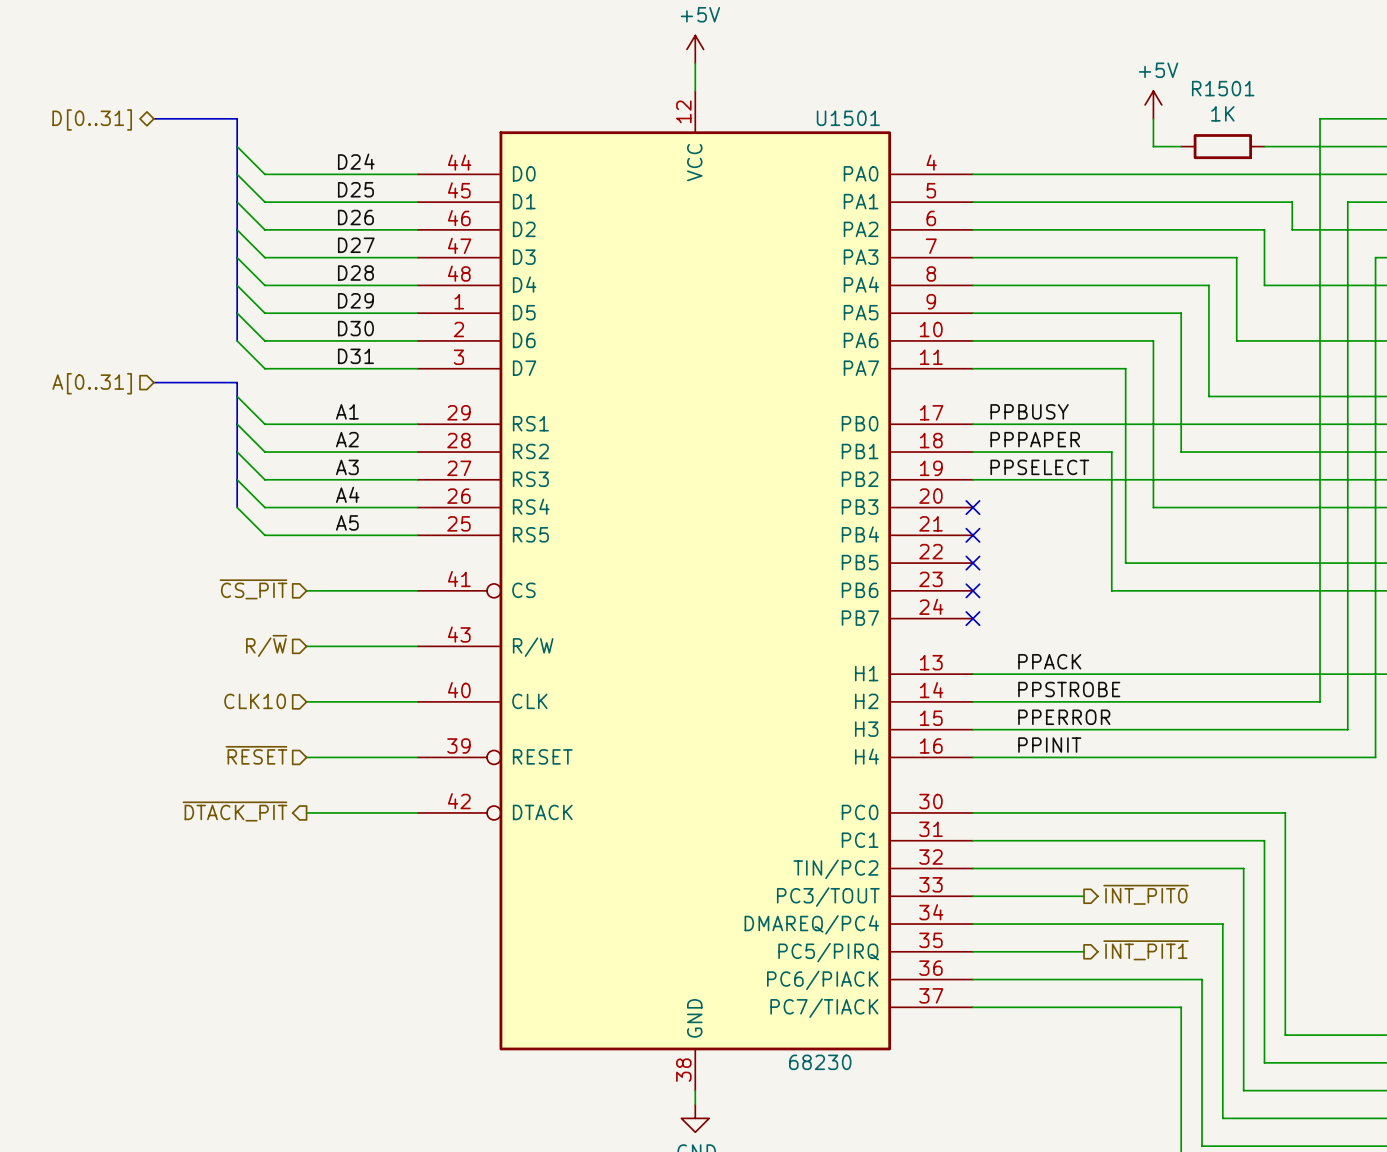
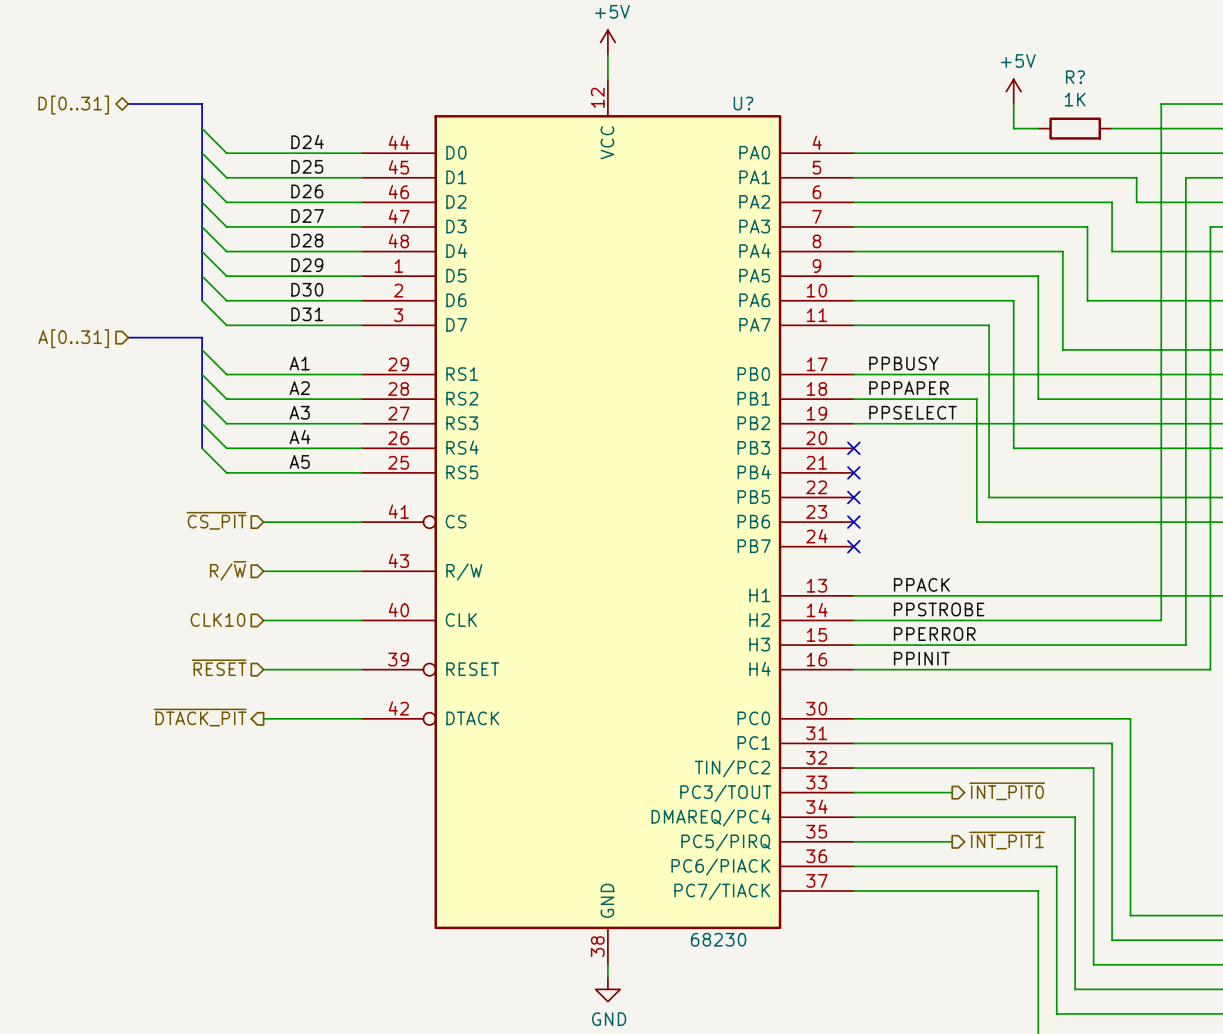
R1501 name: R1501 (1223, 88) -> R? (1075, 77)
U1501 name: U1501 (848, 118) -> U? (743, 103)

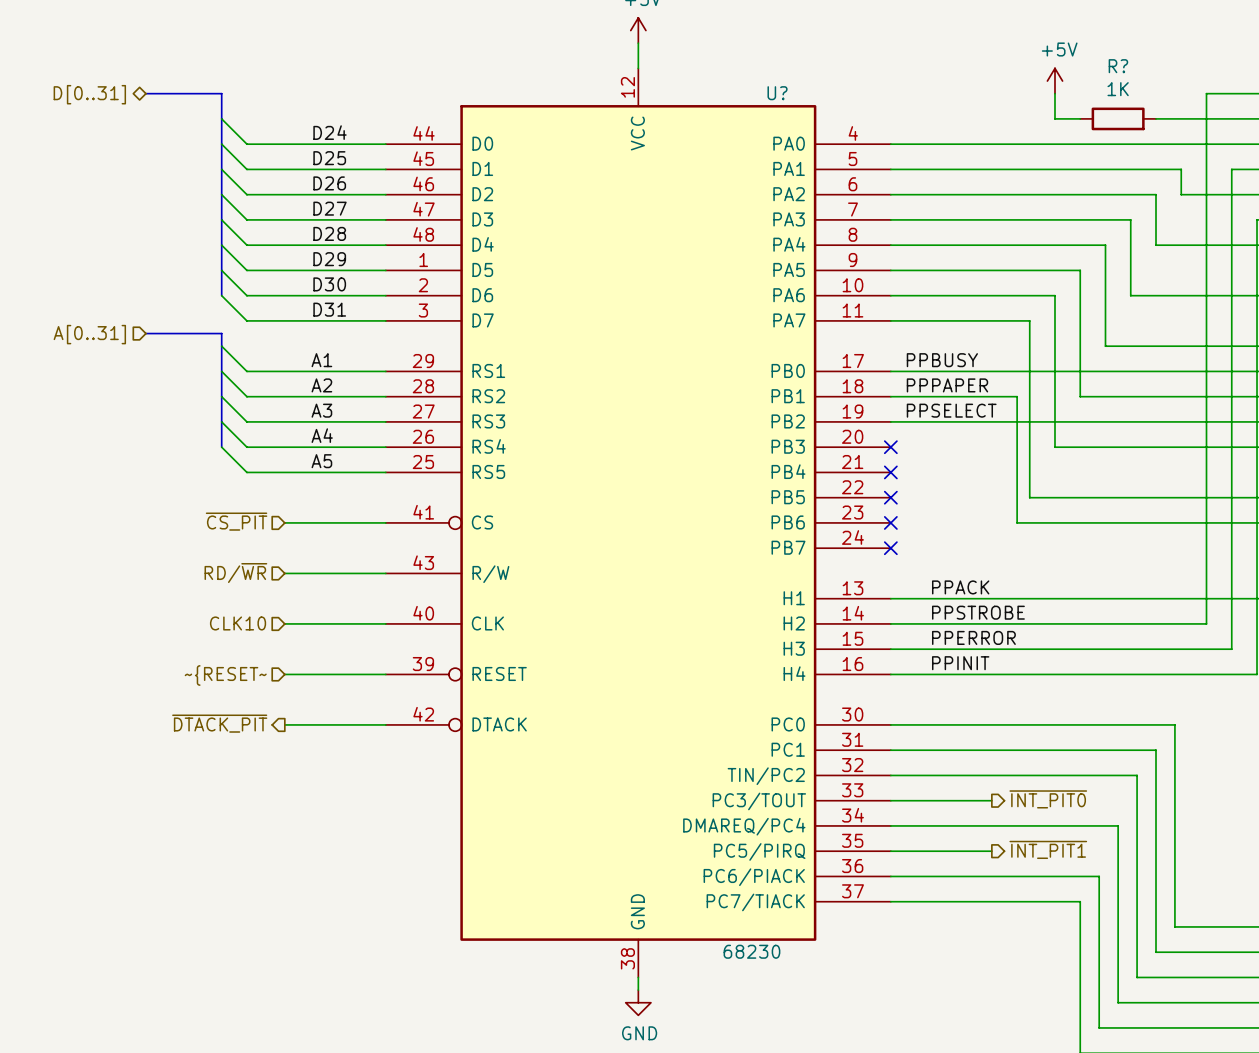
hierarchical label: R/~{W} (228, 570) -> RD/~{WR} (235, 573)
hierarchical label: ~{RESET} (219, 667) -> ~{RESET~ (225, 675)

